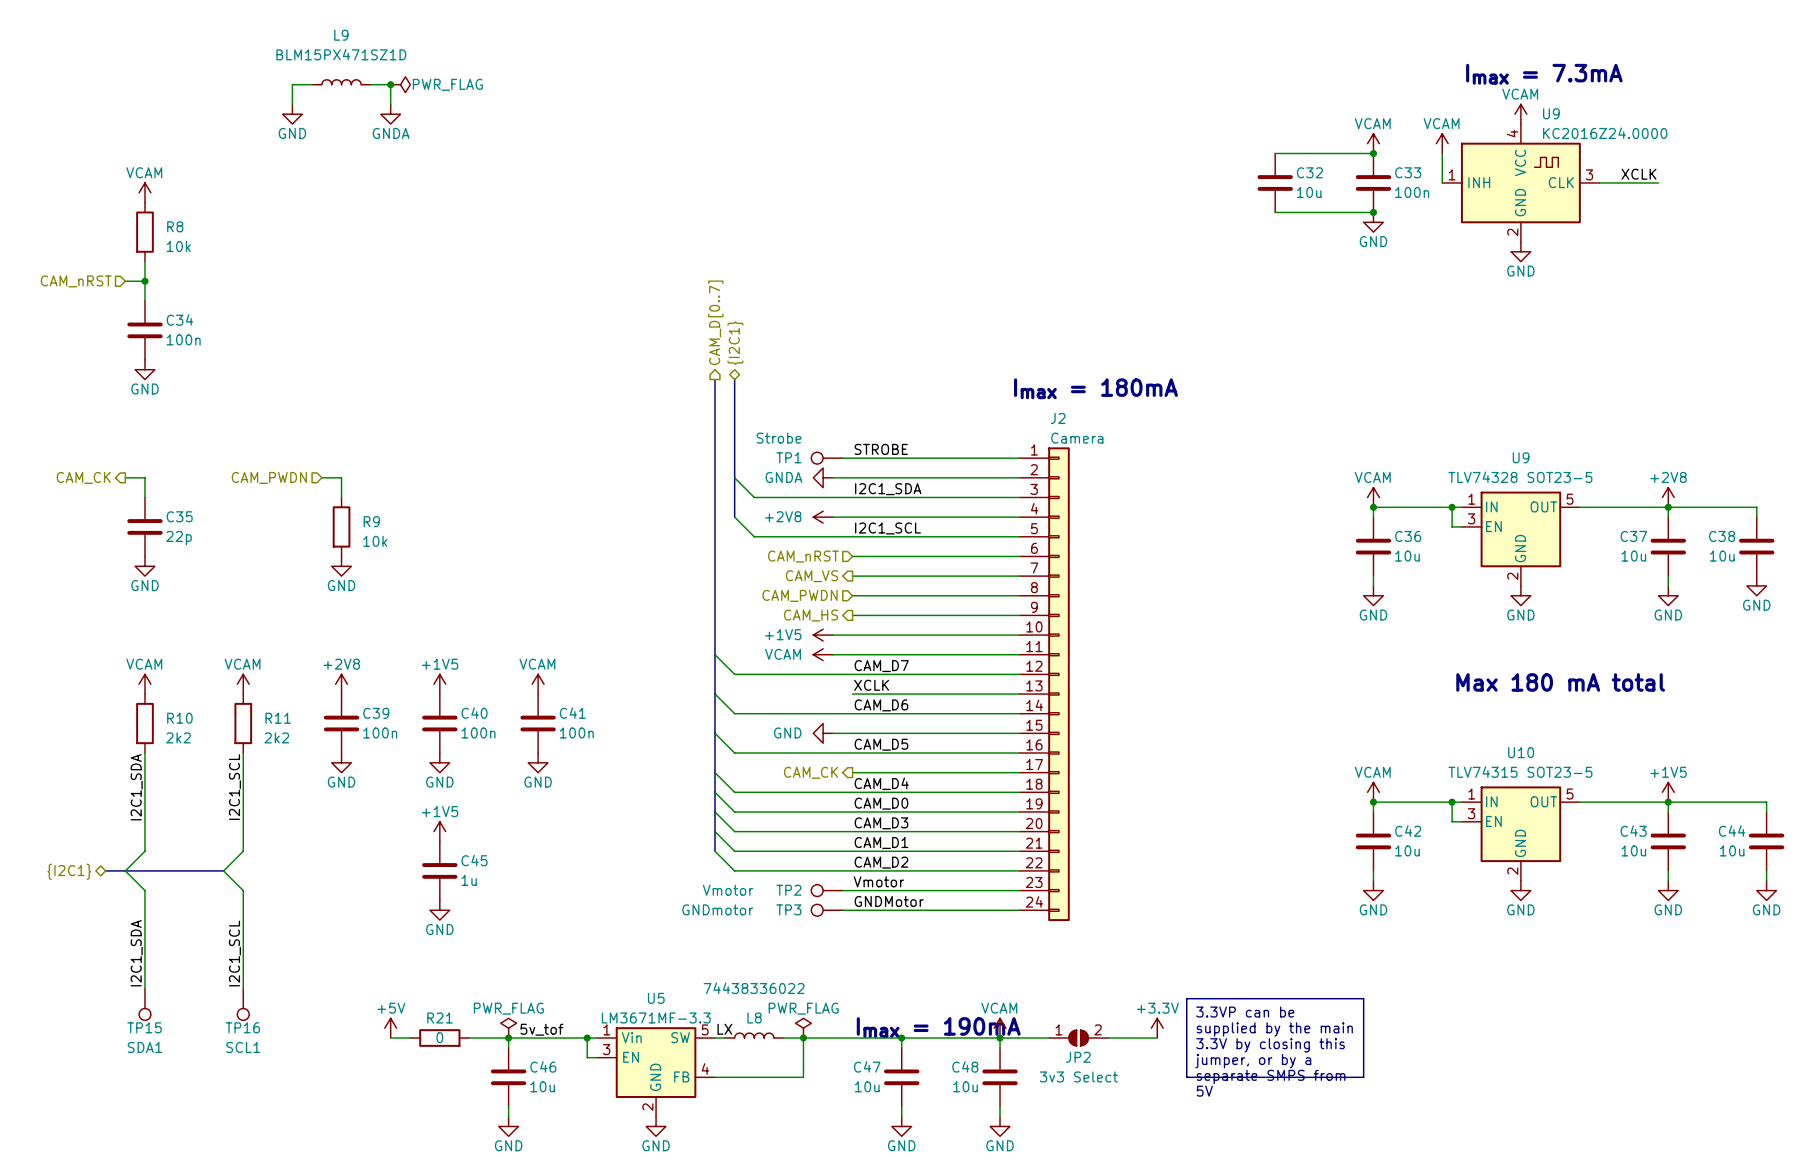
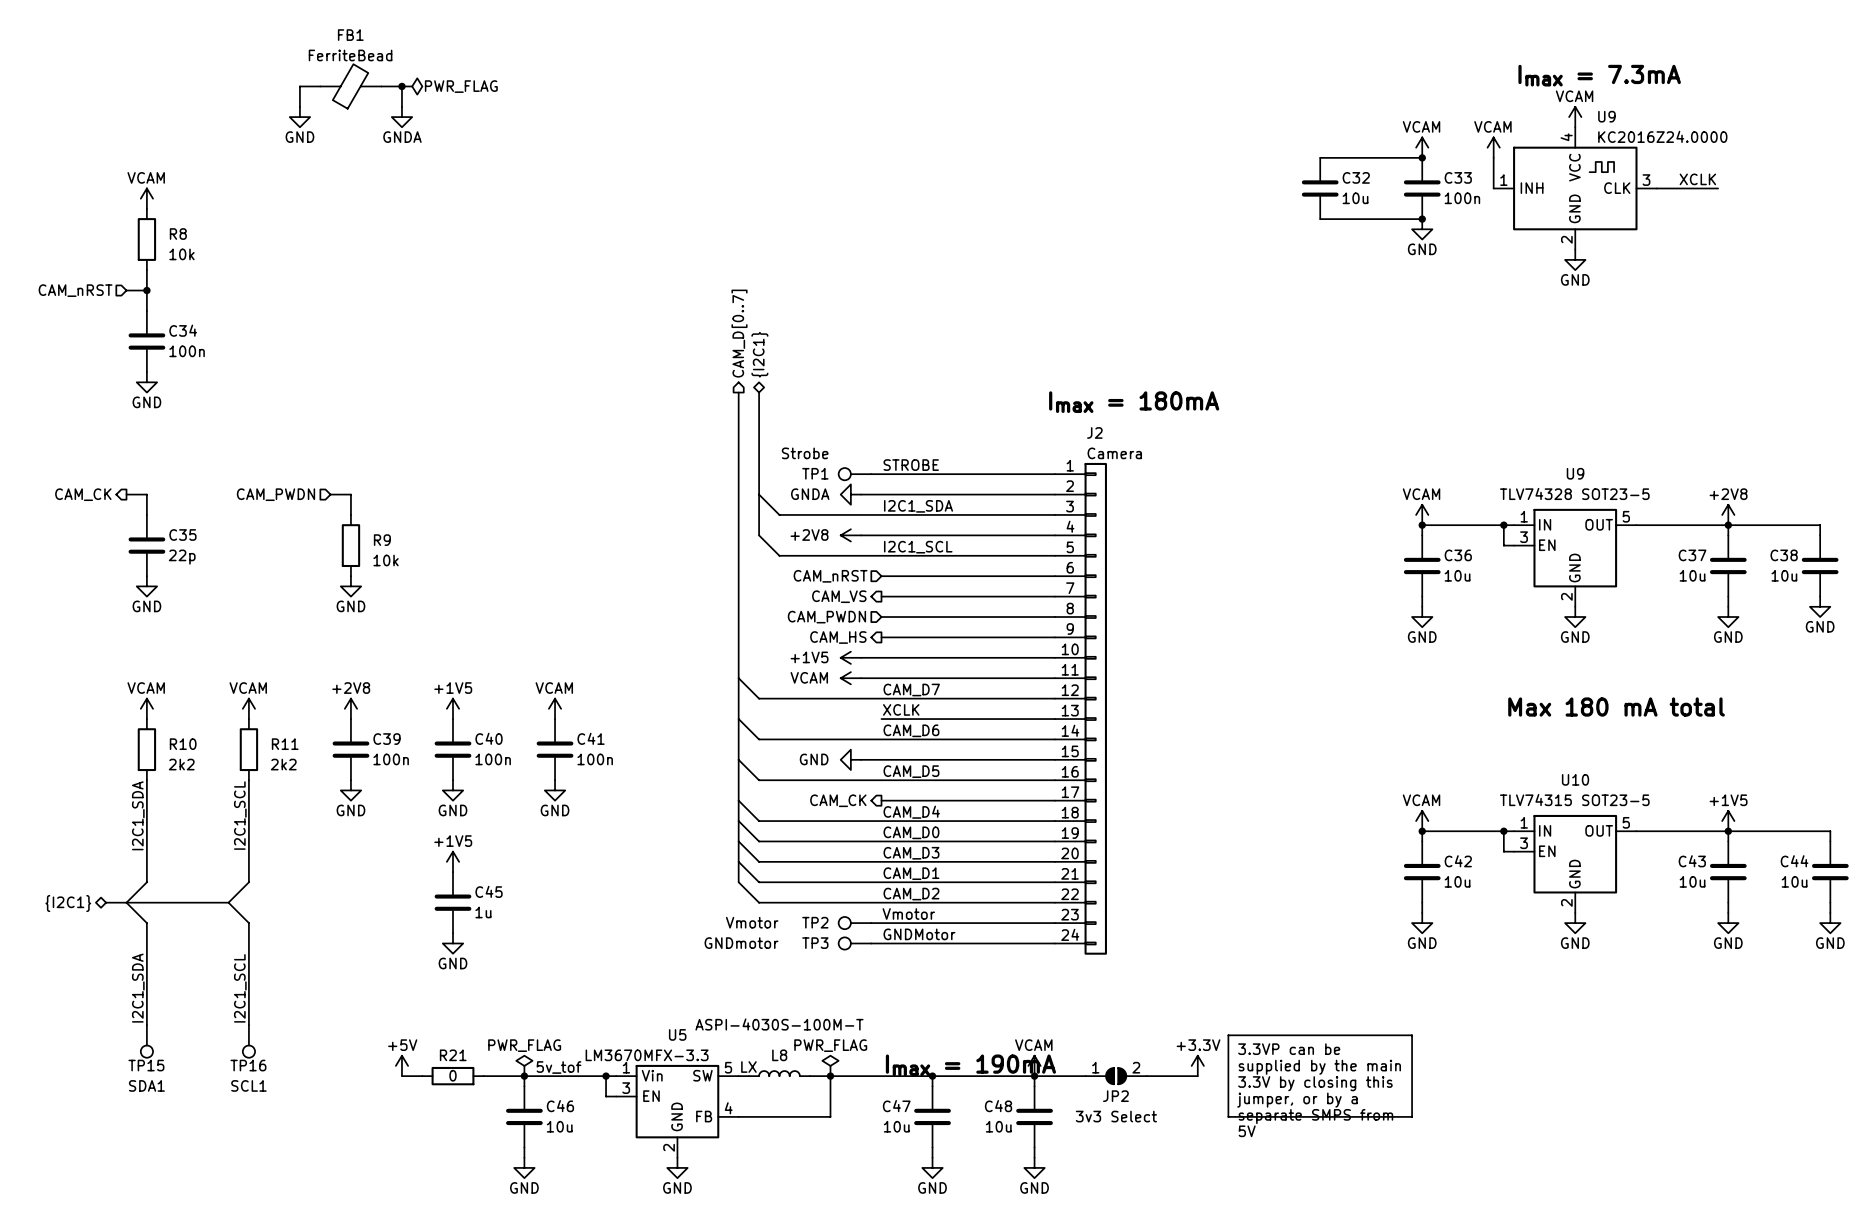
L9: BLM15PX471SZ1D (341, 82) -> none
FB1: none -> FerriteBead (350, 86)
L8 value: 74438336022 (754, 988) -> ASPI-4030S-100M-T (779, 1024)
U5 value: LM3671MF-3.3 (656, 1017) -> LM3670MFX-3.3 (647, 1055)

